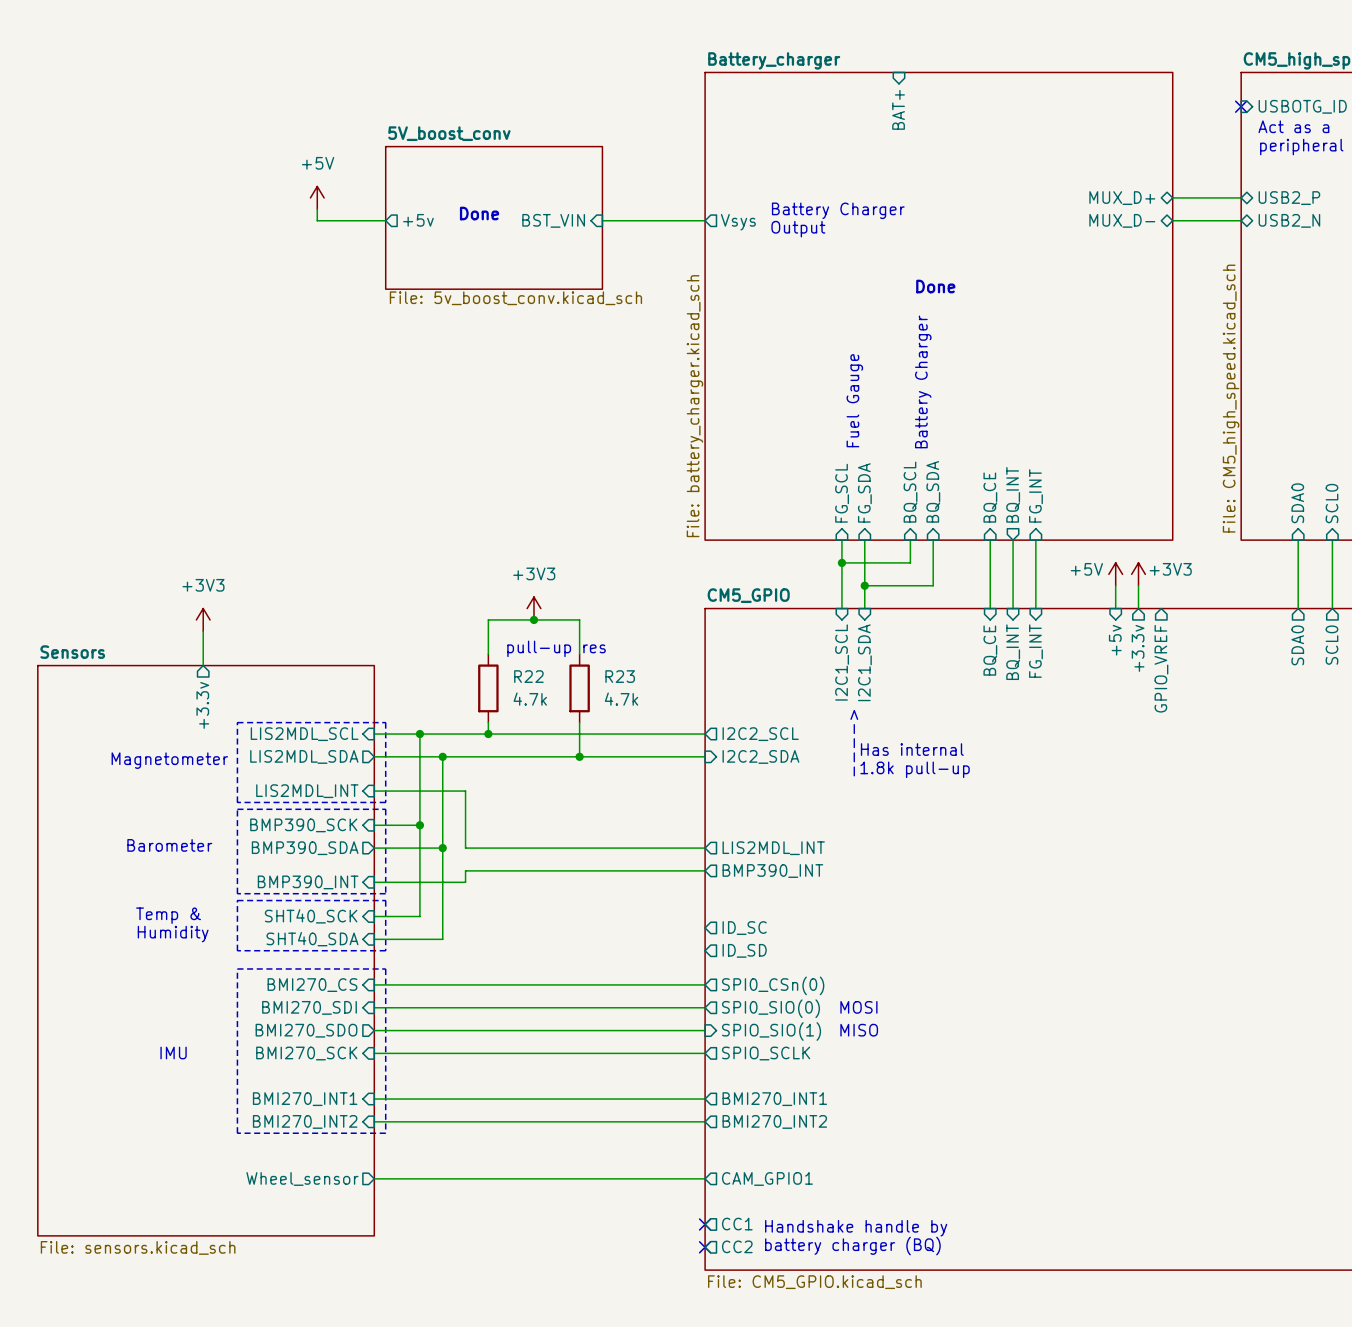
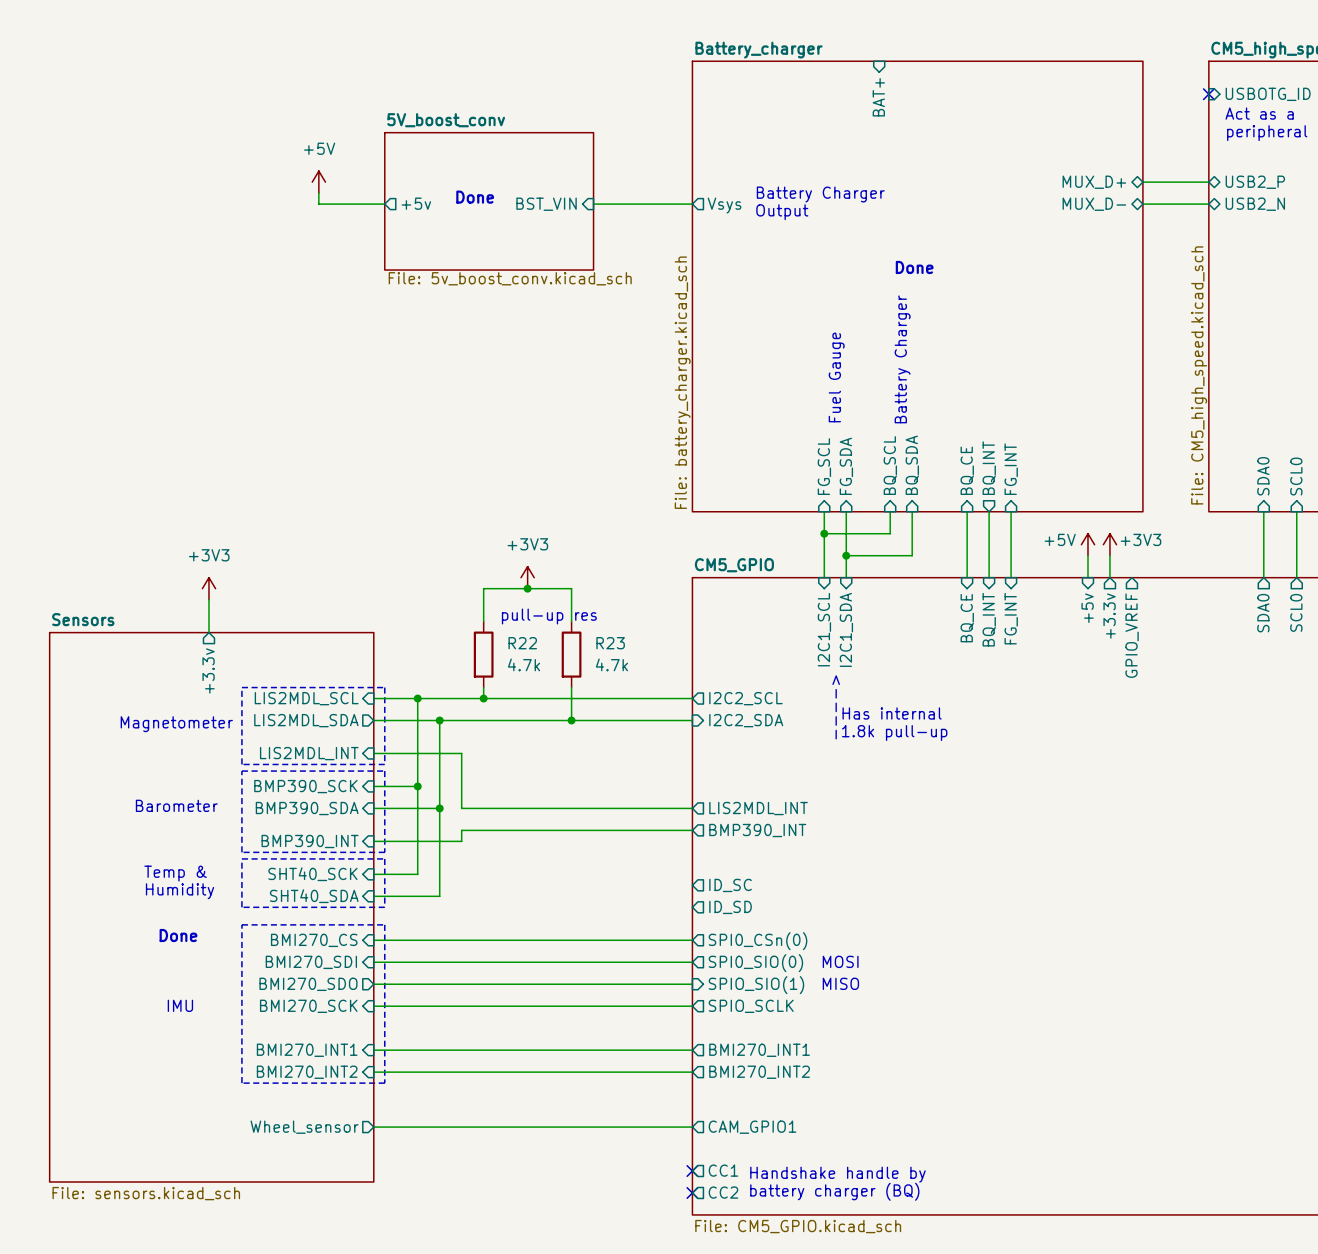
sheet pin shape: output (305, 848) -> input (307, 808)
text: none -> Done (178, 935)

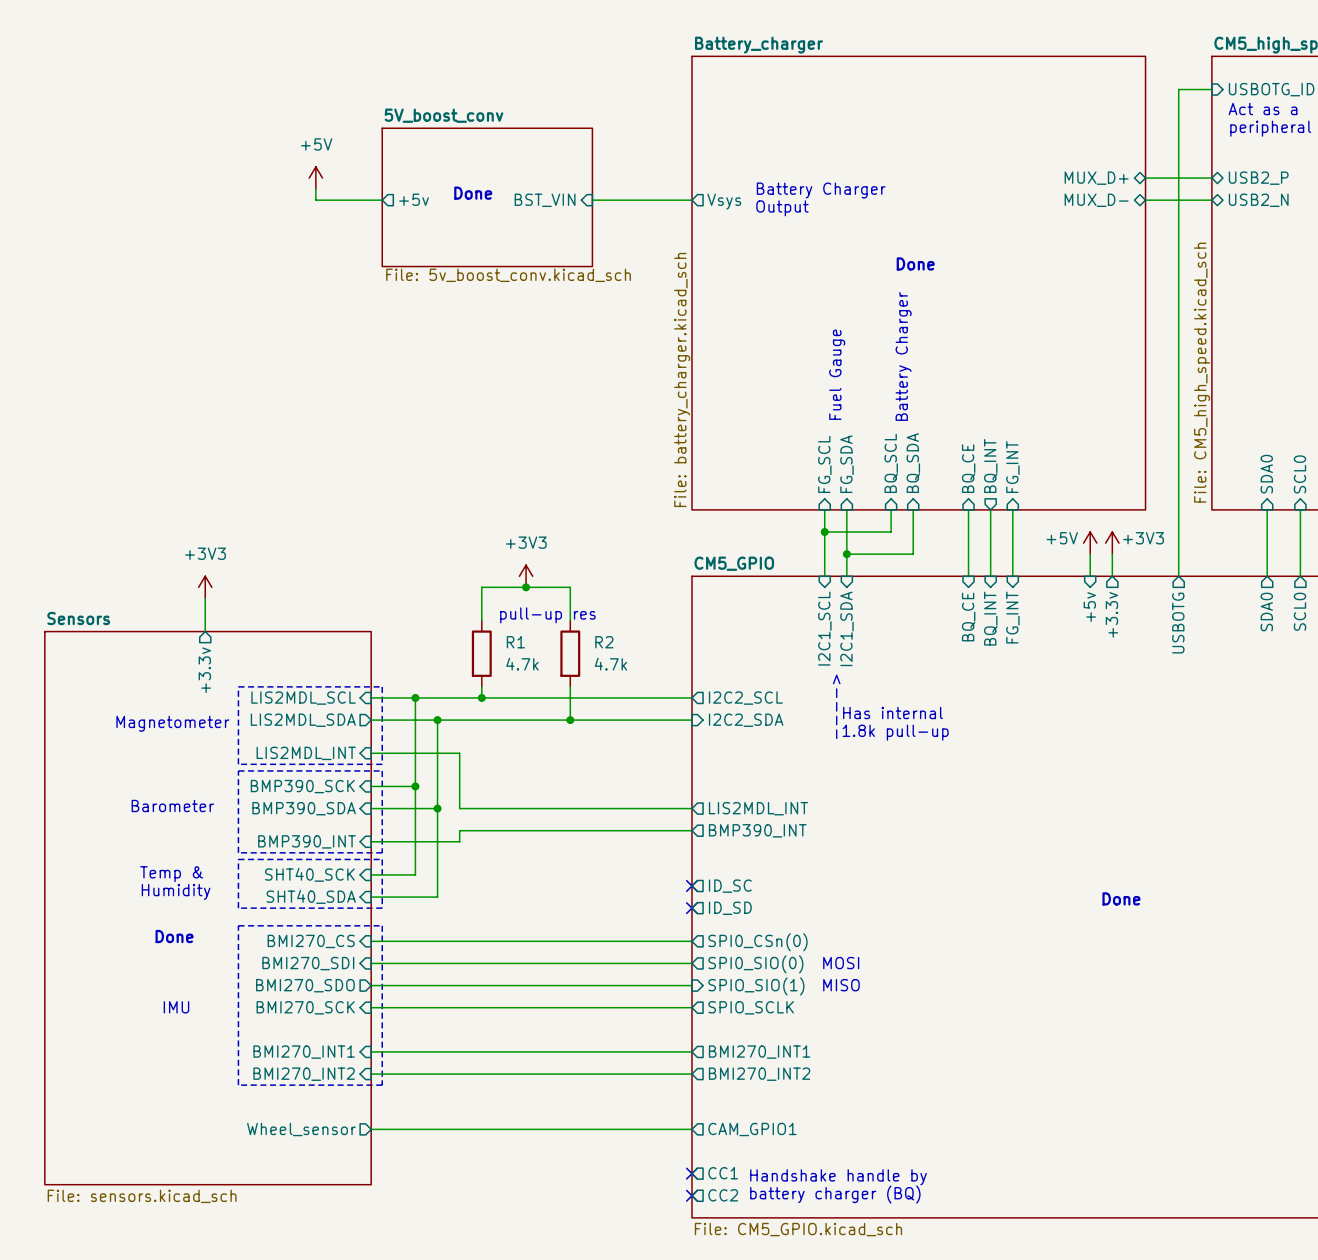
wire: none -> (1211, 89) (1178, 89) (1178, 576)
no-connect mark: (1208, 94) -> none
sheet pin: BAT+ (878, 97) -> none
sheet pin: none -> USBOTG (1178, 623)
sheet pin: GPIO_VREF (1132, 635) -> none
R22 name: R22 (522, 643) -> R1 (515, 642)
R23 name: R23 (610, 643) -> R2 (604, 642)
no-connect mark: none -> (691, 886)
text: none -> Done (1121, 898)
no-connect mark: none -> (691, 908)

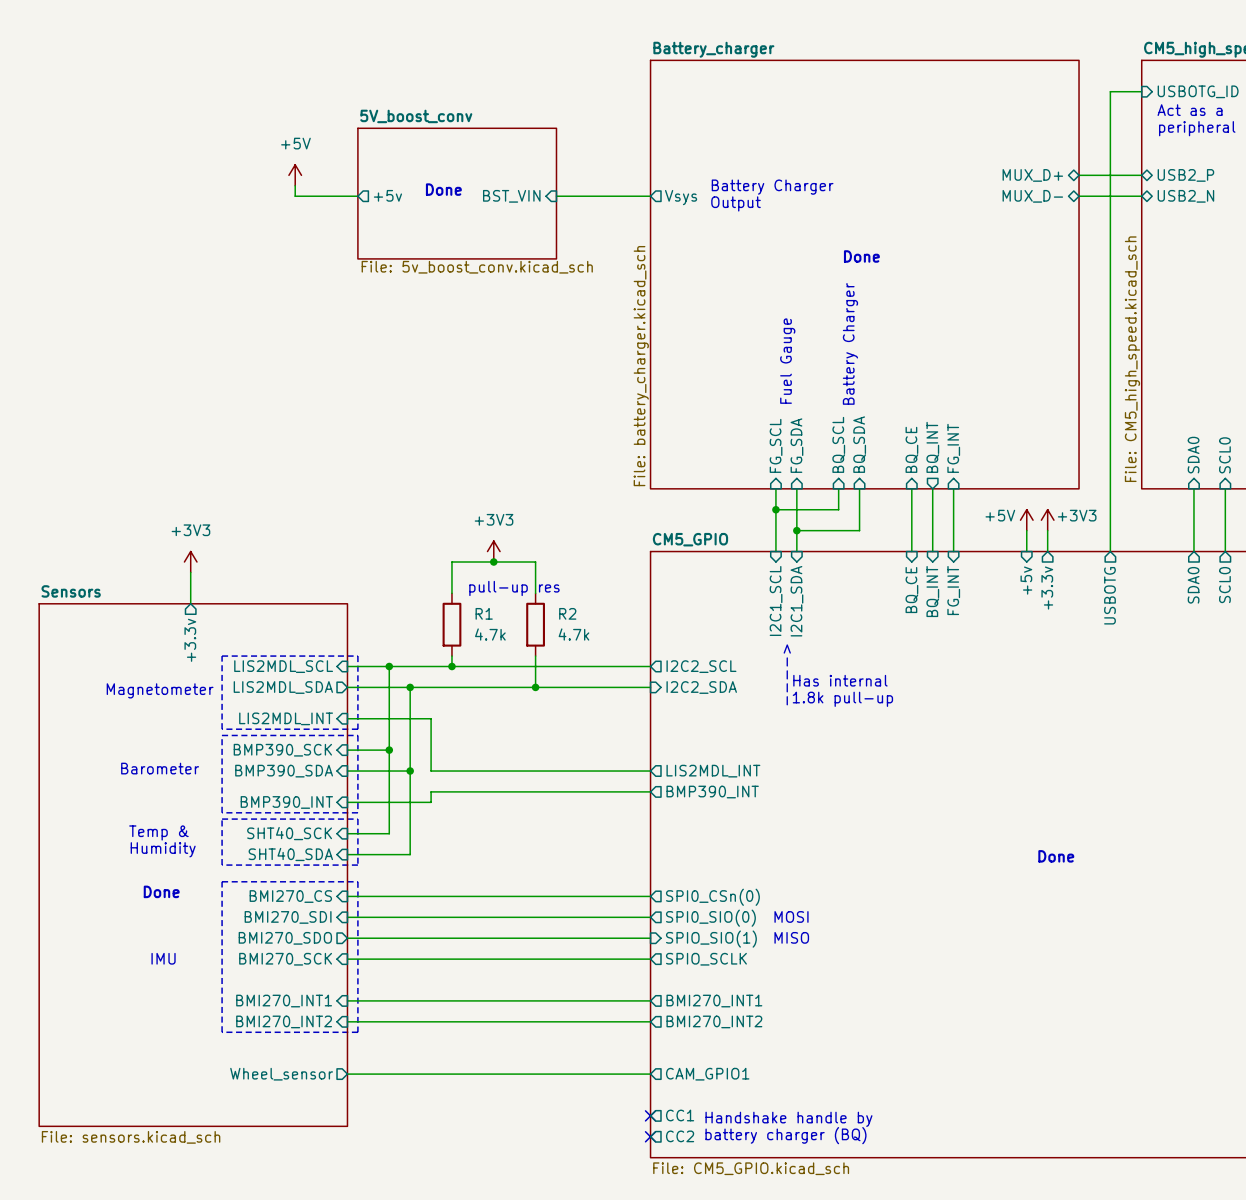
no-connect mark: (691, 886) -> none
sheet pin: ID_SC (730, 886) -> none
no-connect mark: (691, 908) -> none
sheet pin: ID_SD (730, 908) -> none

